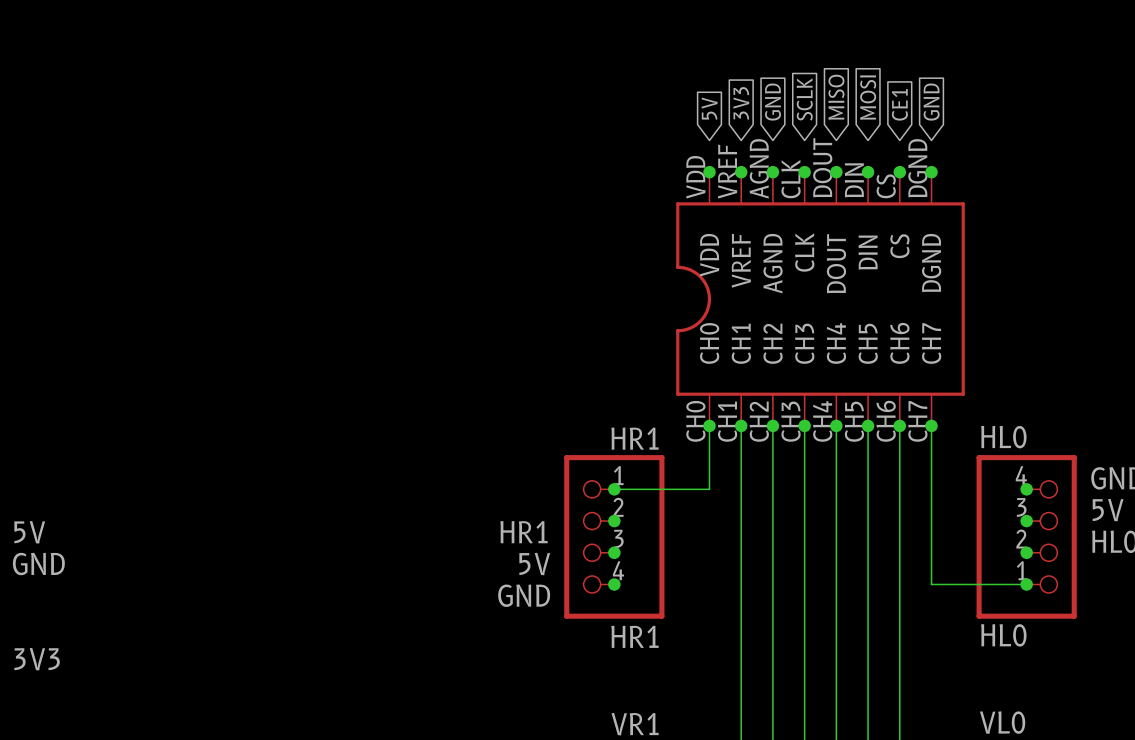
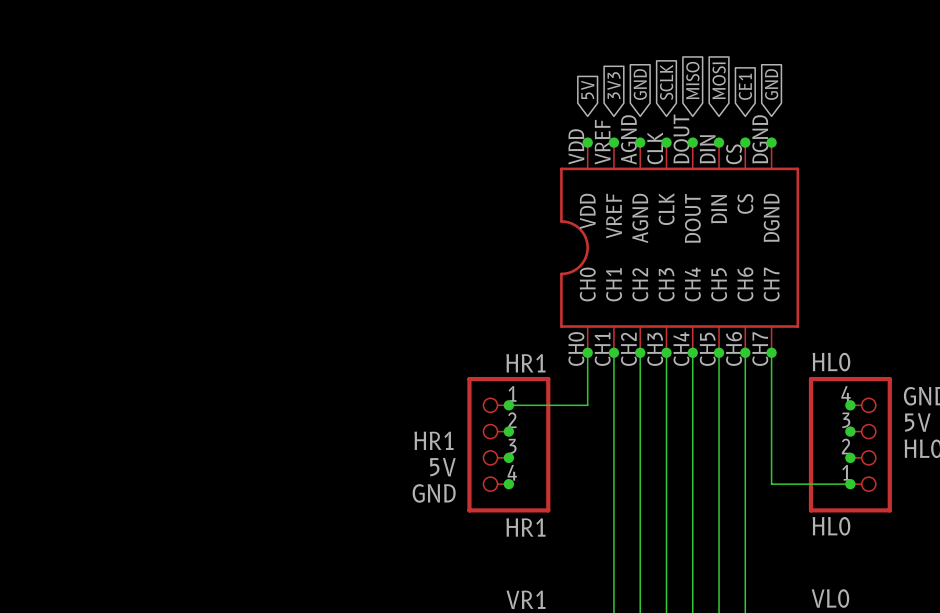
label: 5V (29, 532) -> none
label: GND (38, 564) -> none
label: 3V3 (37, 659) -> none

